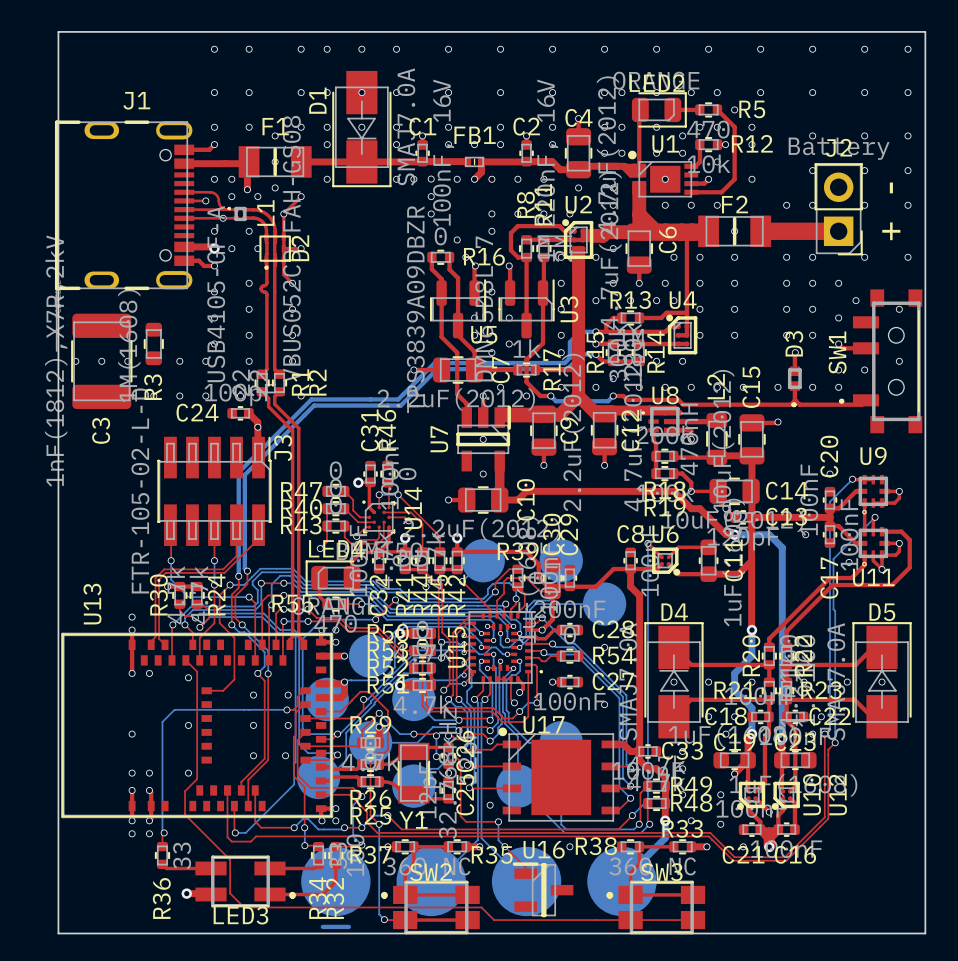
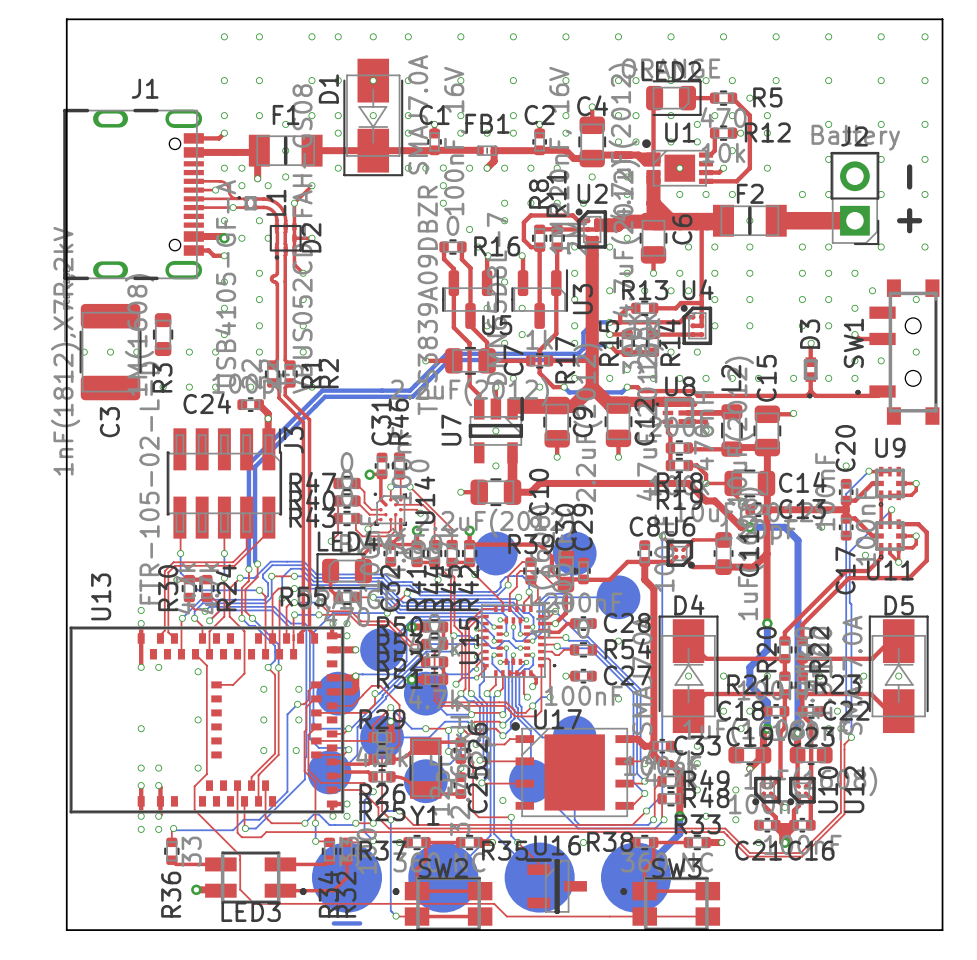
bottom track: (286, 709) (174, 709) (162, 721) (162, 831) (164, 832) -> (297, 704) (287, 714) (287, 791) (259, 819) (243, 819) (233, 830) (175, 830) (173, 828)

